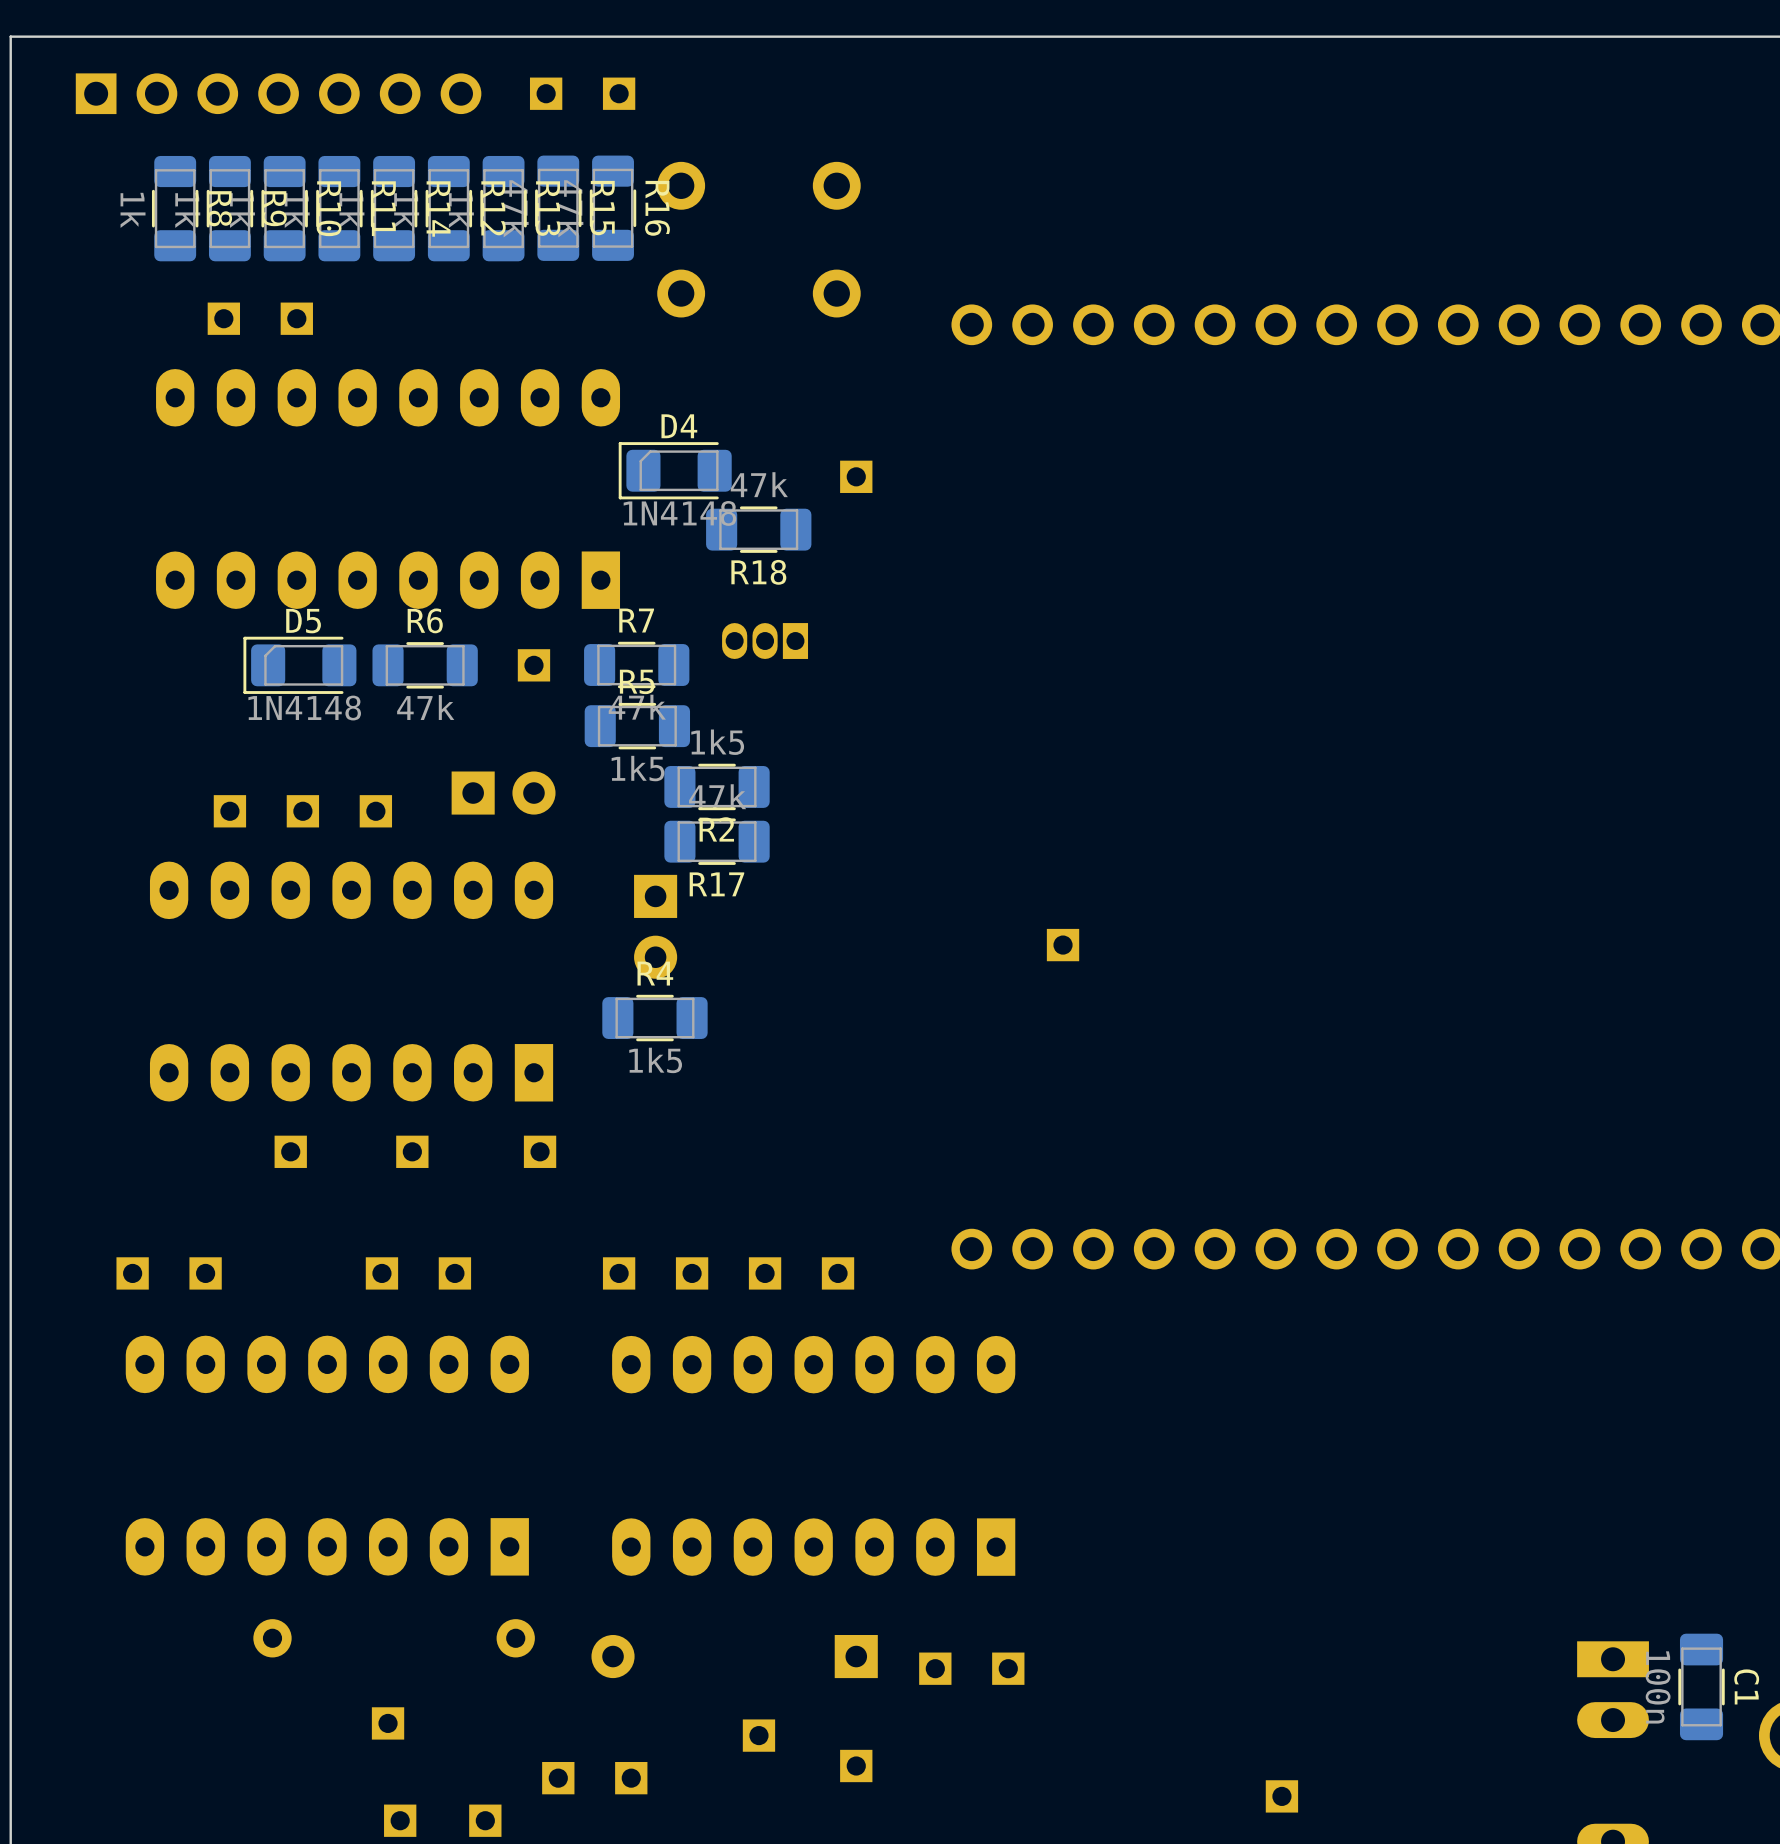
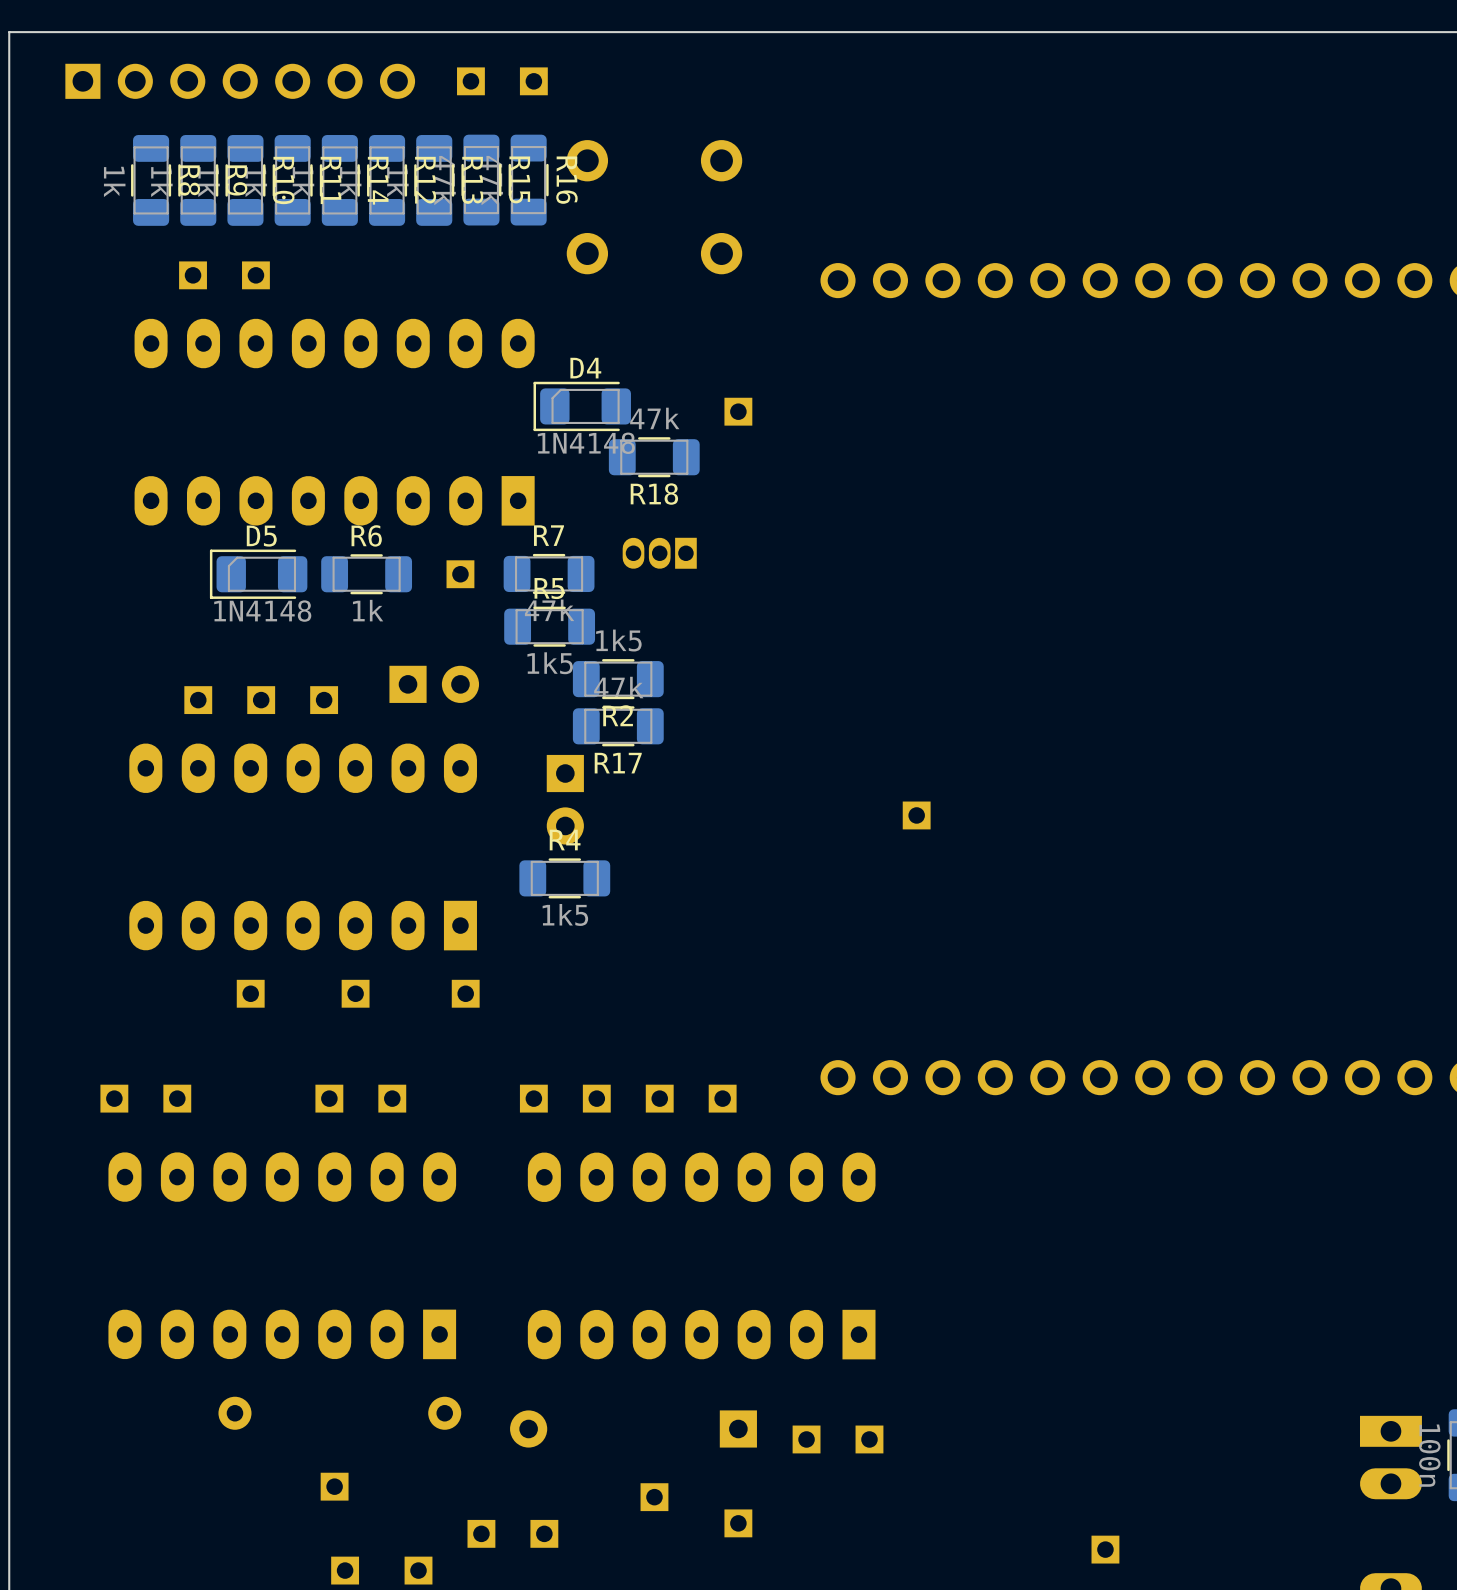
R6 value: 47k (425, 707) -> 1k (368, 610)

